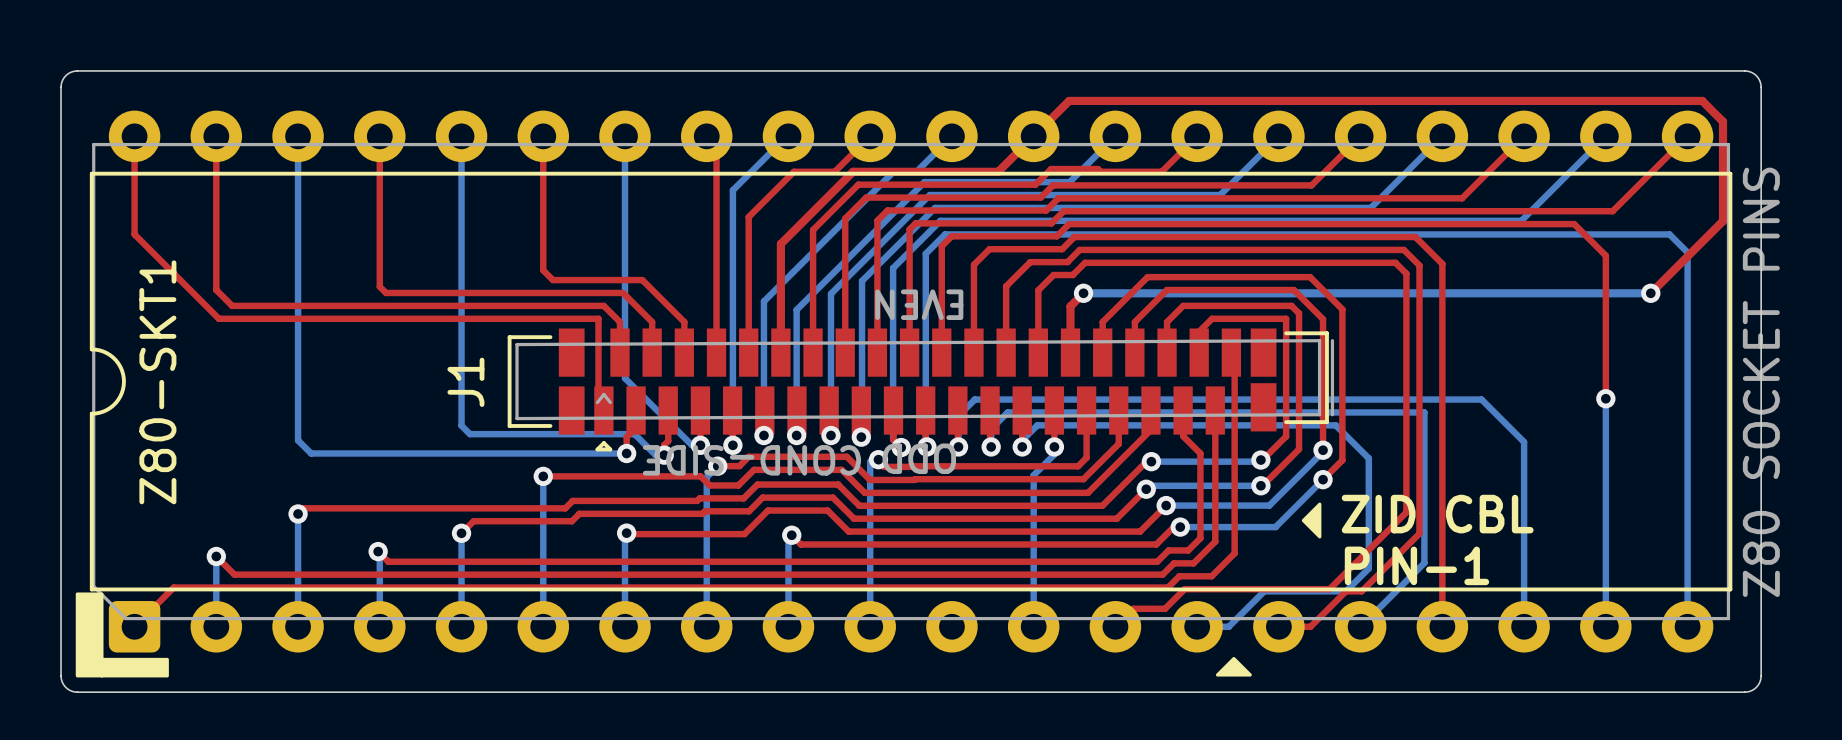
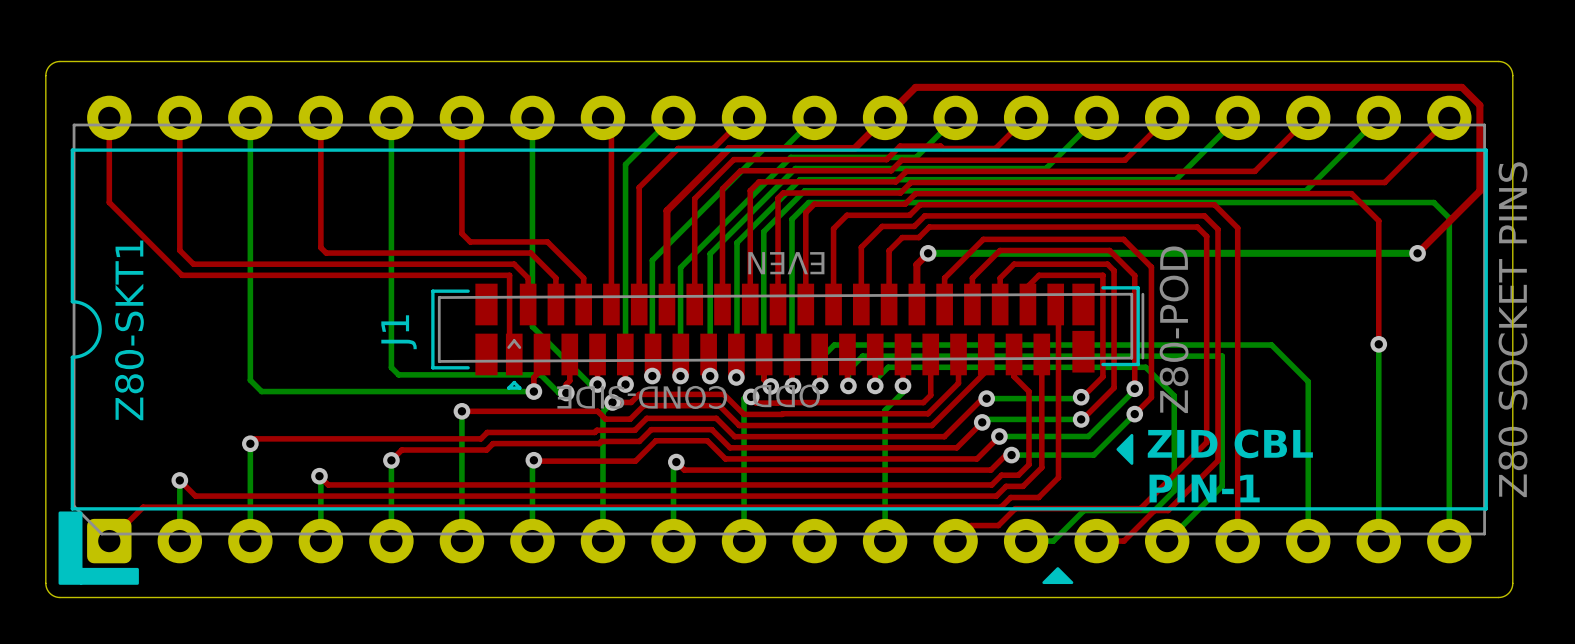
J1 value: none -> Z80-POD (1174, 329)

